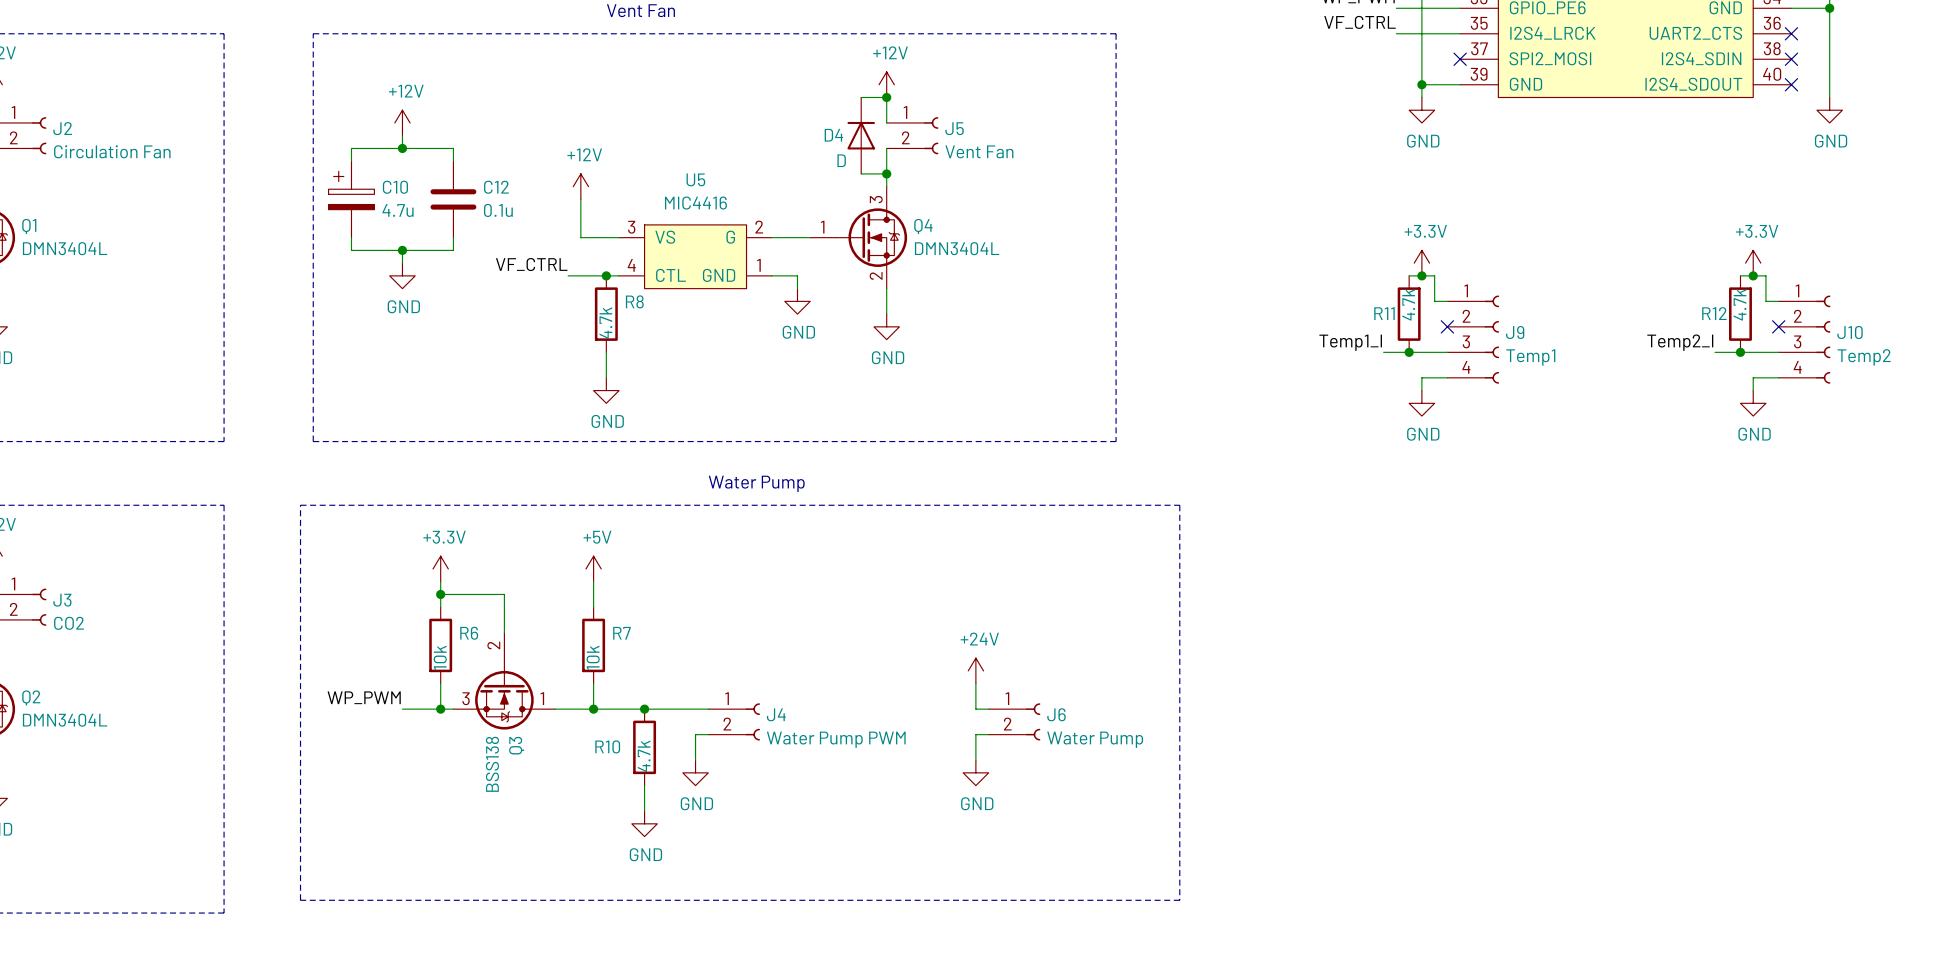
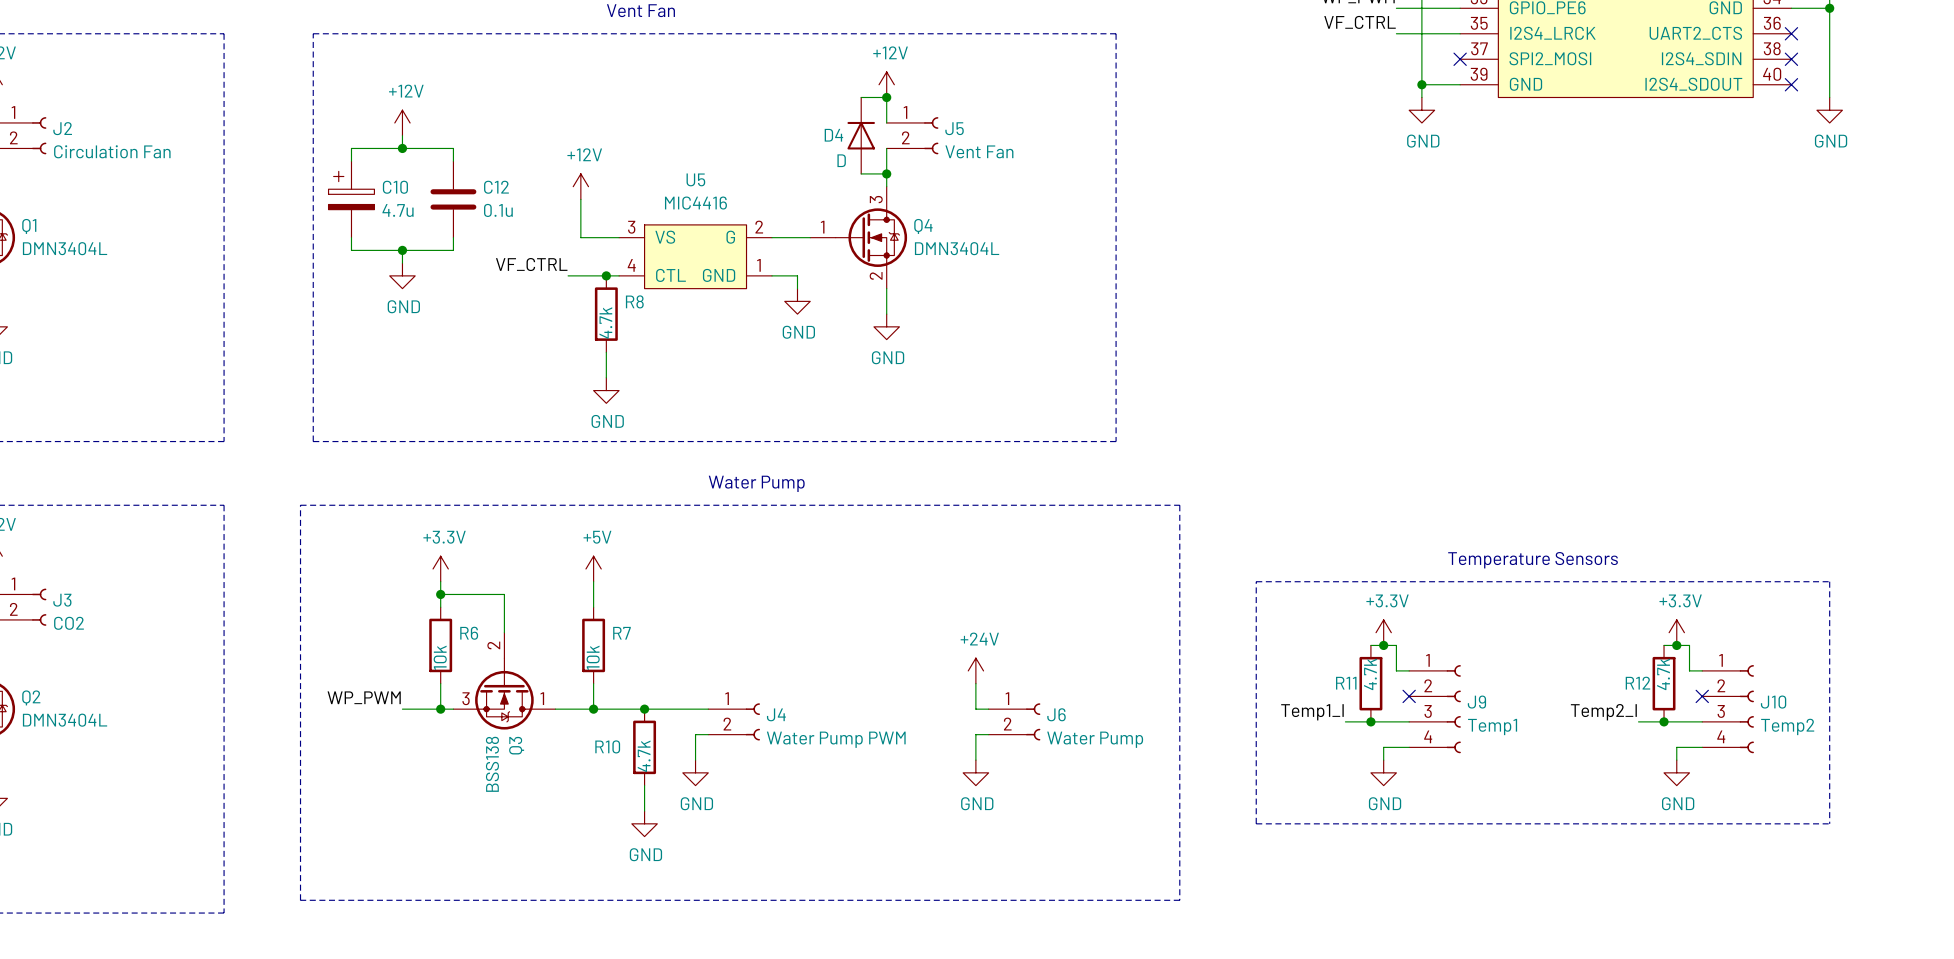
power symbol: +3.3V (1421, 263) -> none
power symbol: +3.3V (1753, 263) -> none
wire: (1409, 275) (1434, 275) (1434, 301) (1447, 301) -> none
junction: (1421, 275) -> none
wire: (1740, 275) (1765, 275) (1765, 301) (1778, 301) -> none
junction: (1753, 275) -> none
R11 position: (1409, 314) -> (1370, 683)
R12 position: (1740, 314) -> (1664, 683)
no-connect mark: (1447, 326) -> none
no-connect mark: (1778, 326) -> none
J9 position: (1473, 339) -> (1435, 709)
J10 position: (1804, 339) -> (1728, 709)
label: Temp1_I (1350, 342) -> none
label: Temp2_I (1680, 342) -> none
wire: (1383, 352) (1447, 352) -> none
junction: (1409, 352) -> none
wire: (1714, 352) (1778, 352) -> none
junction: (1740, 352) -> none
wire: (1447, 377) (1421, 377) (1421, 390) -> none
wire: (1778, 377) (1753, 377) (1753, 390) -> none
power symbol: GND (1421, 403) -> none
power symbol: GND (1753, 403) -> none
text: none -> Temperature Sensors (1533, 560)
line: none -> (1256, 581) (1829, 581) (1829, 823) (1256, 823) (1256, 581)
power symbol: none -> +3.3V (1383, 632)
power symbol: none -> +3.3V (1676, 632)
wire: none -> (1370, 645) (1396, 645) (1396, 670) (1409, 670)
junction: none -> (1383, 645)
wire: none -> (1664, 645) (1689, 645) (1689, 670) (1702, 670)
junction: none -> (1676, 645)
no-connect mark: none -> (1409, 696)
no-connect mark: none -> (1702, 696)
label: none -> Temp1_I (1312, 712)
label: none -> Temp2_I (1603, 712)
wire: none -> (1345, 721) (1409, 721)
junction: none -> (1370, 721)
wire: none -> (1638, 721) (1702, 721)
junction: none -> (1664, 721)
wire: none -> (1409, 747) (1383, 747) (1383, 760)
wire: none -> (1702, 747) (1676, 747) (1676, 760)
power symbol: none -> GND (1383, 772)
power symbol: none -> GND (1676, 772)

